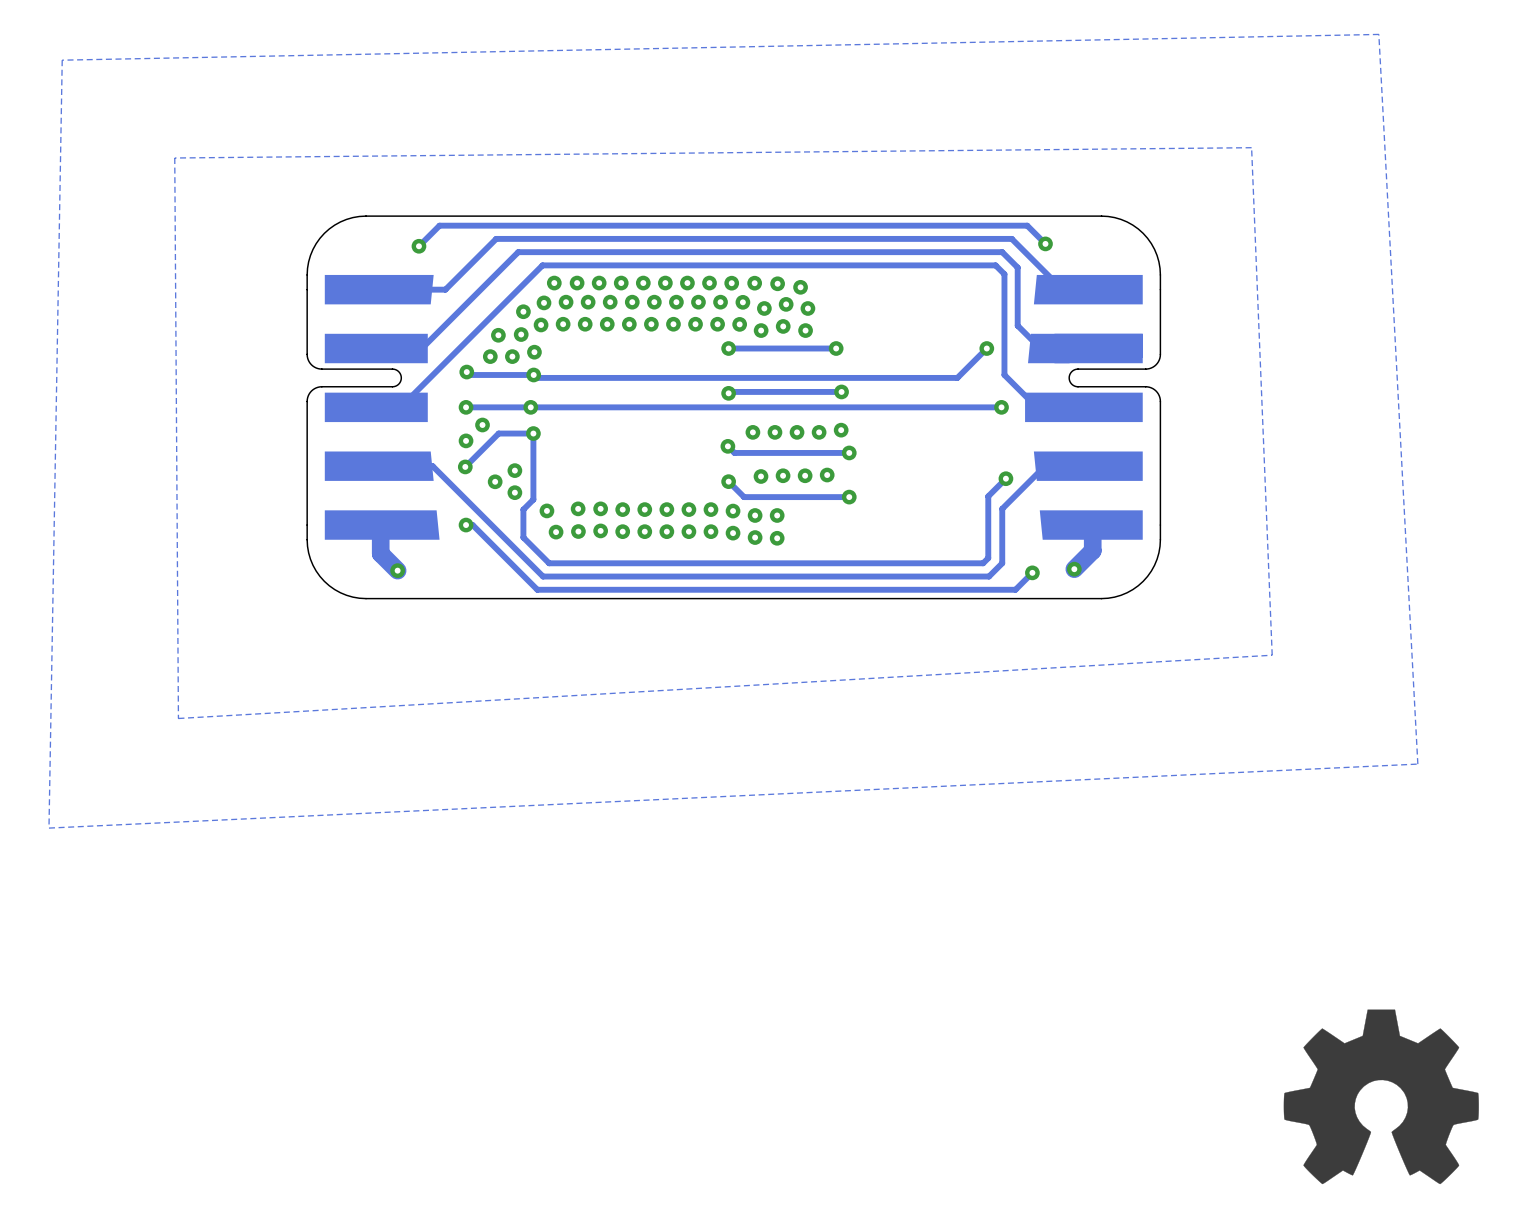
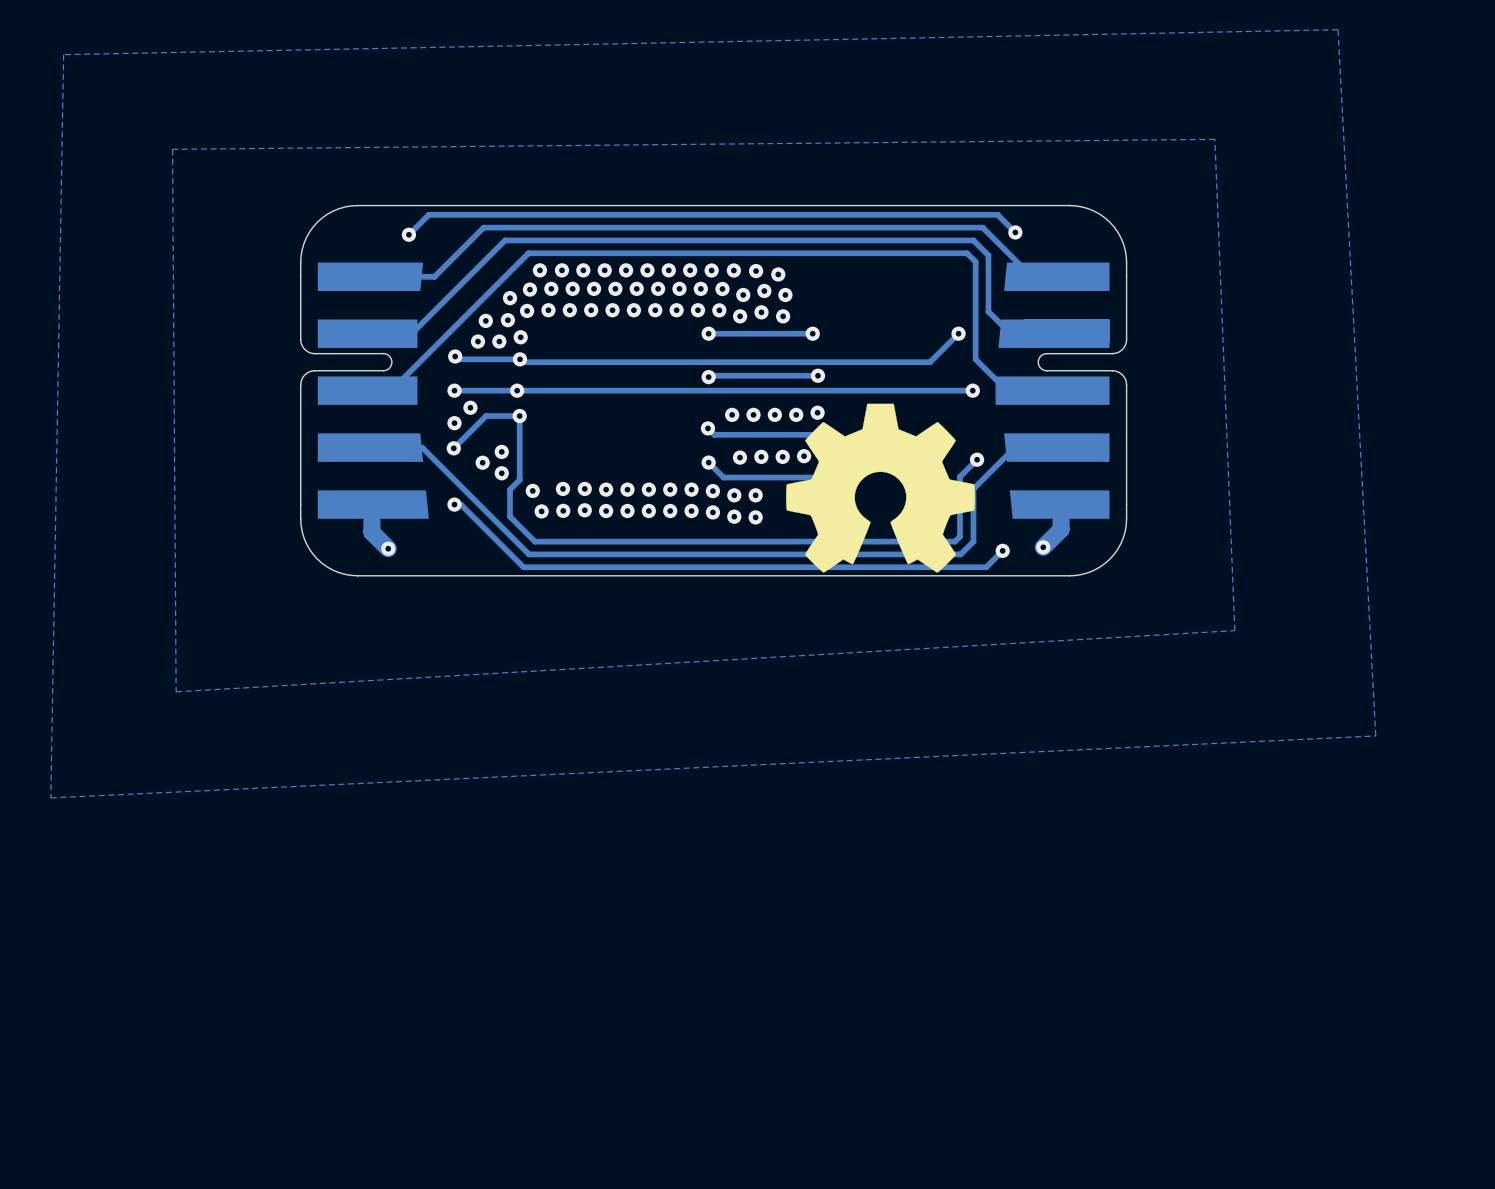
drawing: none -> [786, 403, 975, 573]
drawing: [1283, 1009, 1479, 1185] -> none

